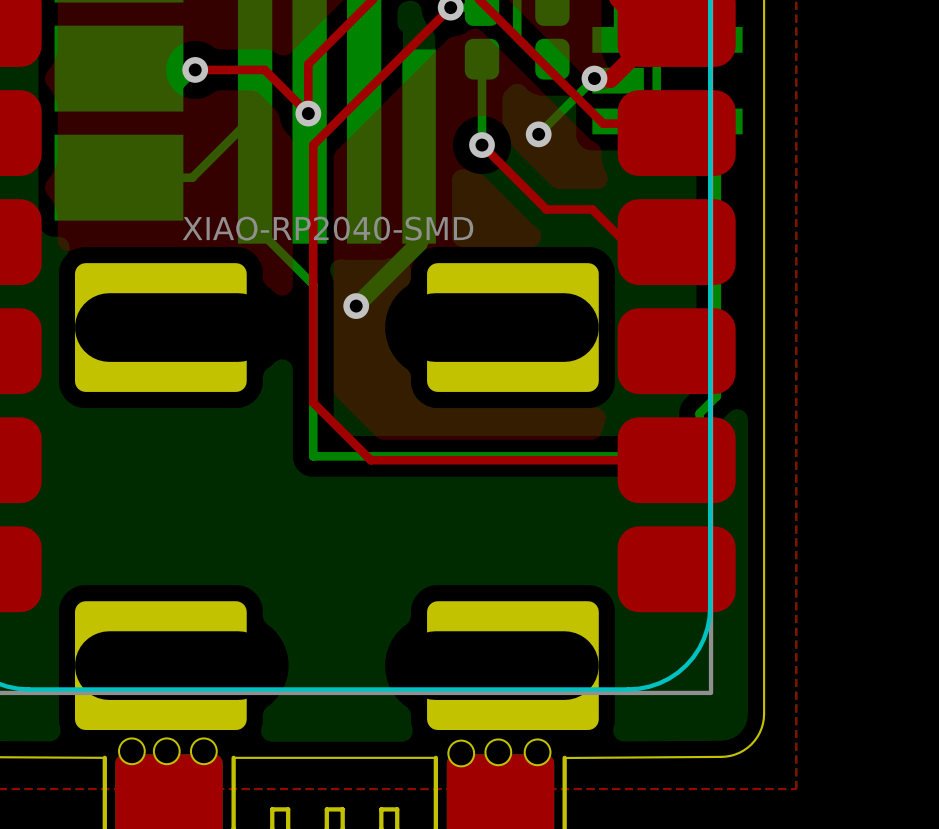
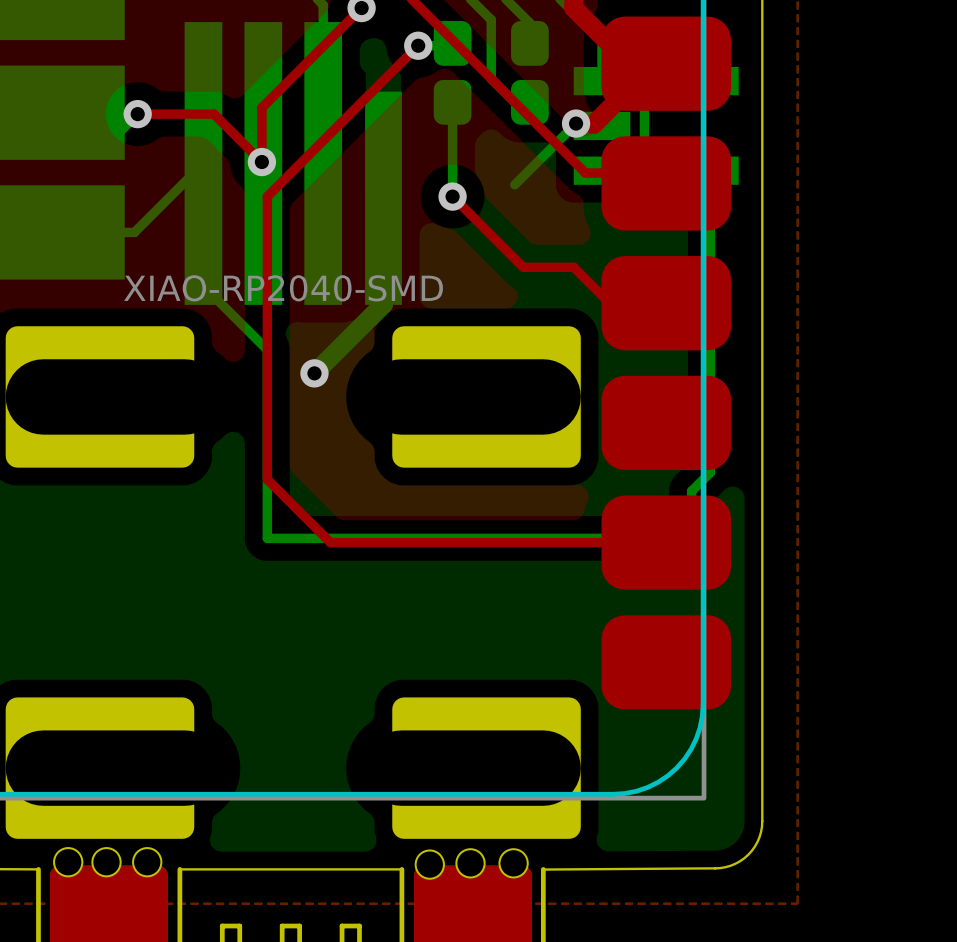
via: (538, 134) -> none

